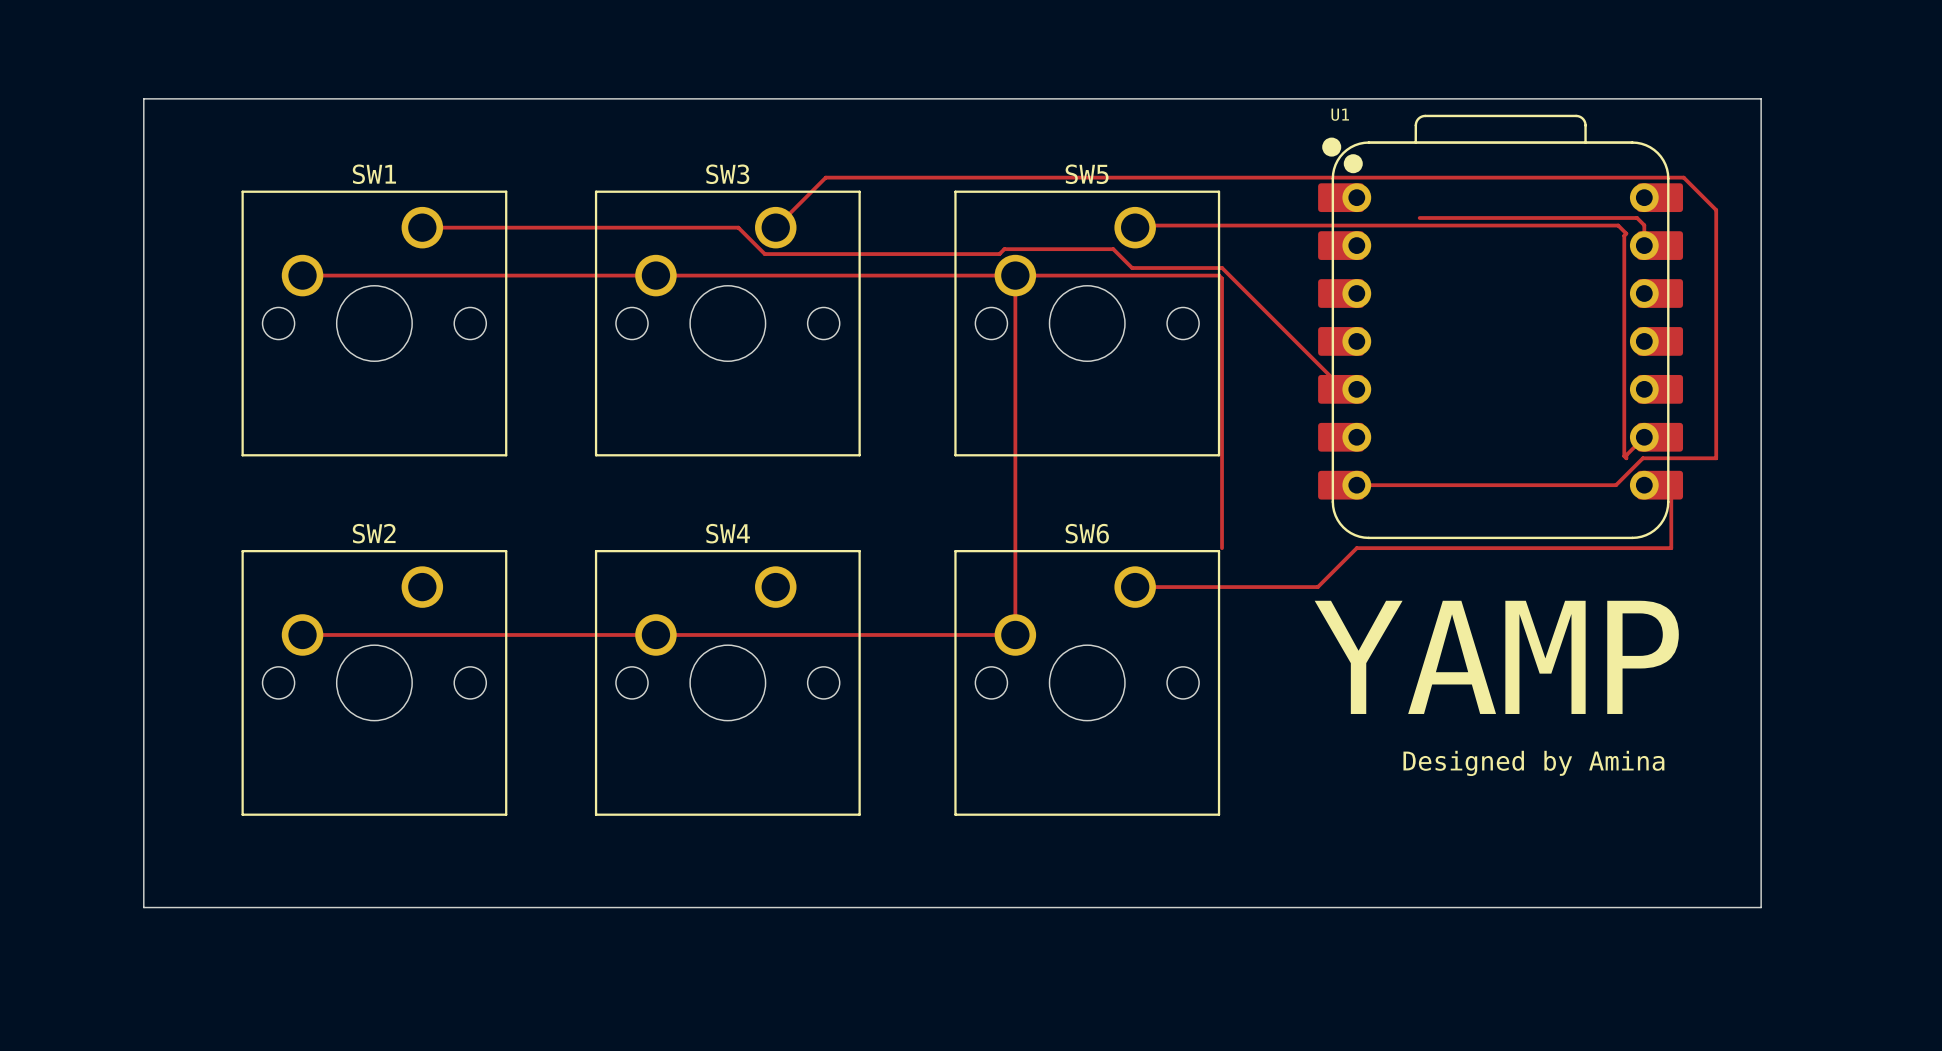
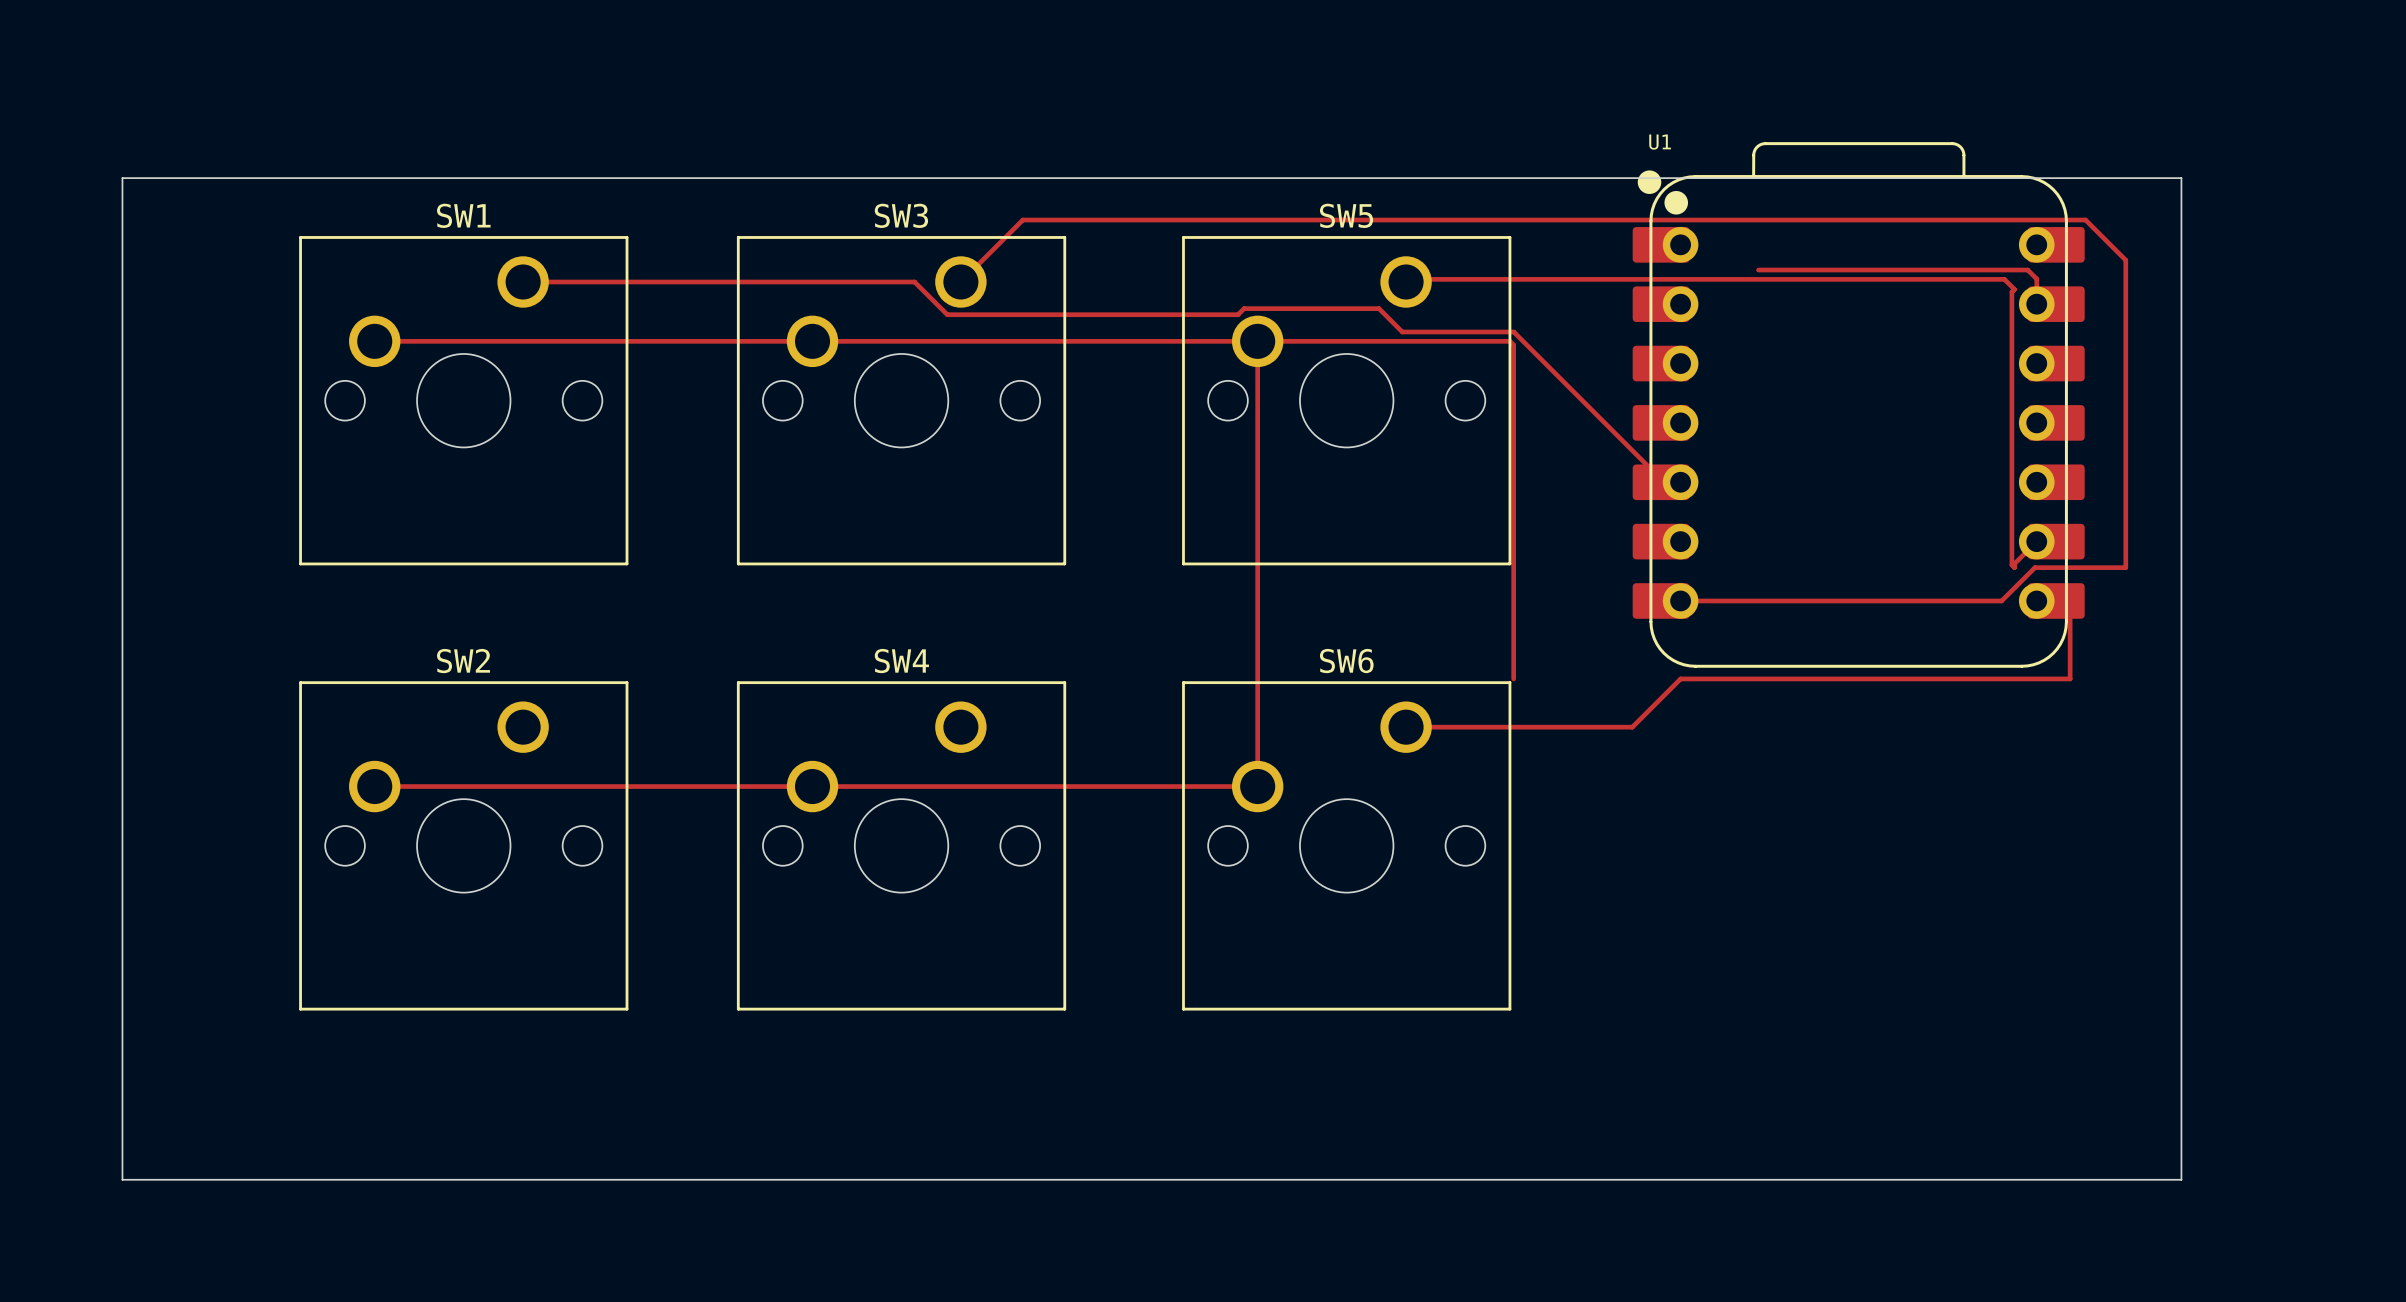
board edge: (1761, 143) (1761, 98) (143, 98) (143, 907) (1761, 907) -> (2181, 178) (122, 178) (122, 1179) (2181, 1179) (2181, 1124)
text: YAMP (1496, 657) -> none
text: Designed by Amina (1533, 763) -> none

